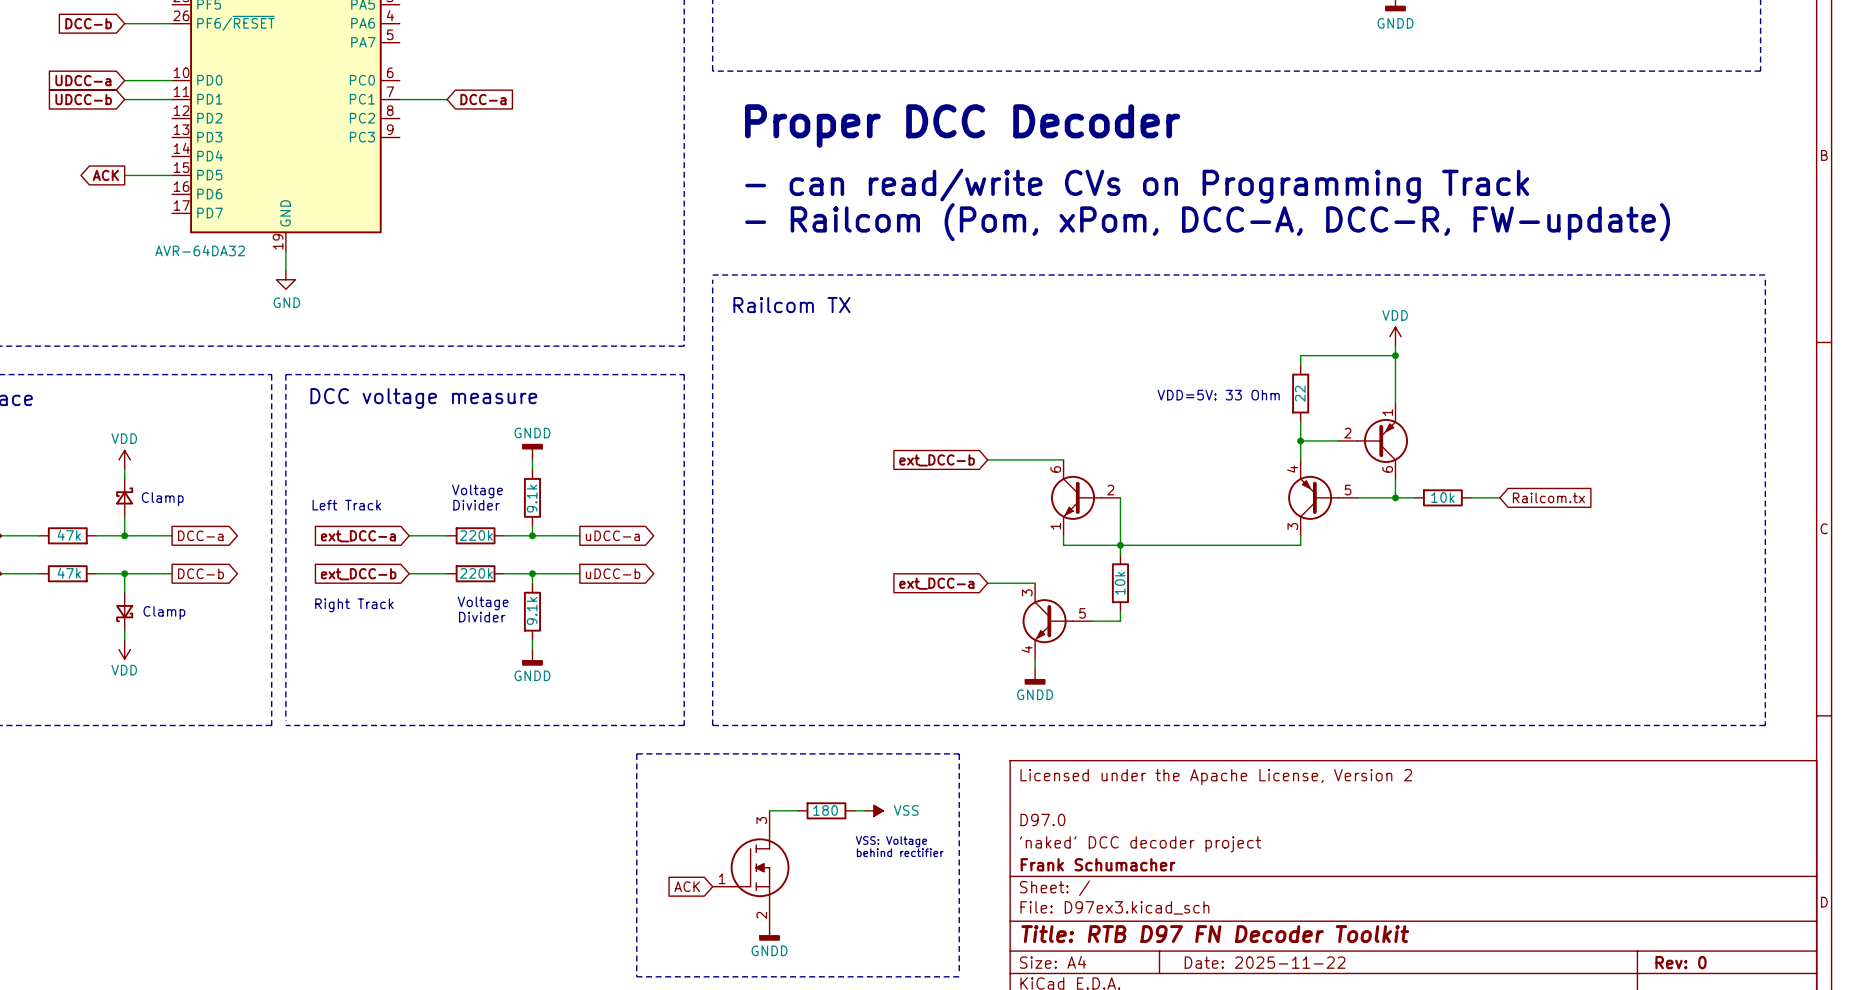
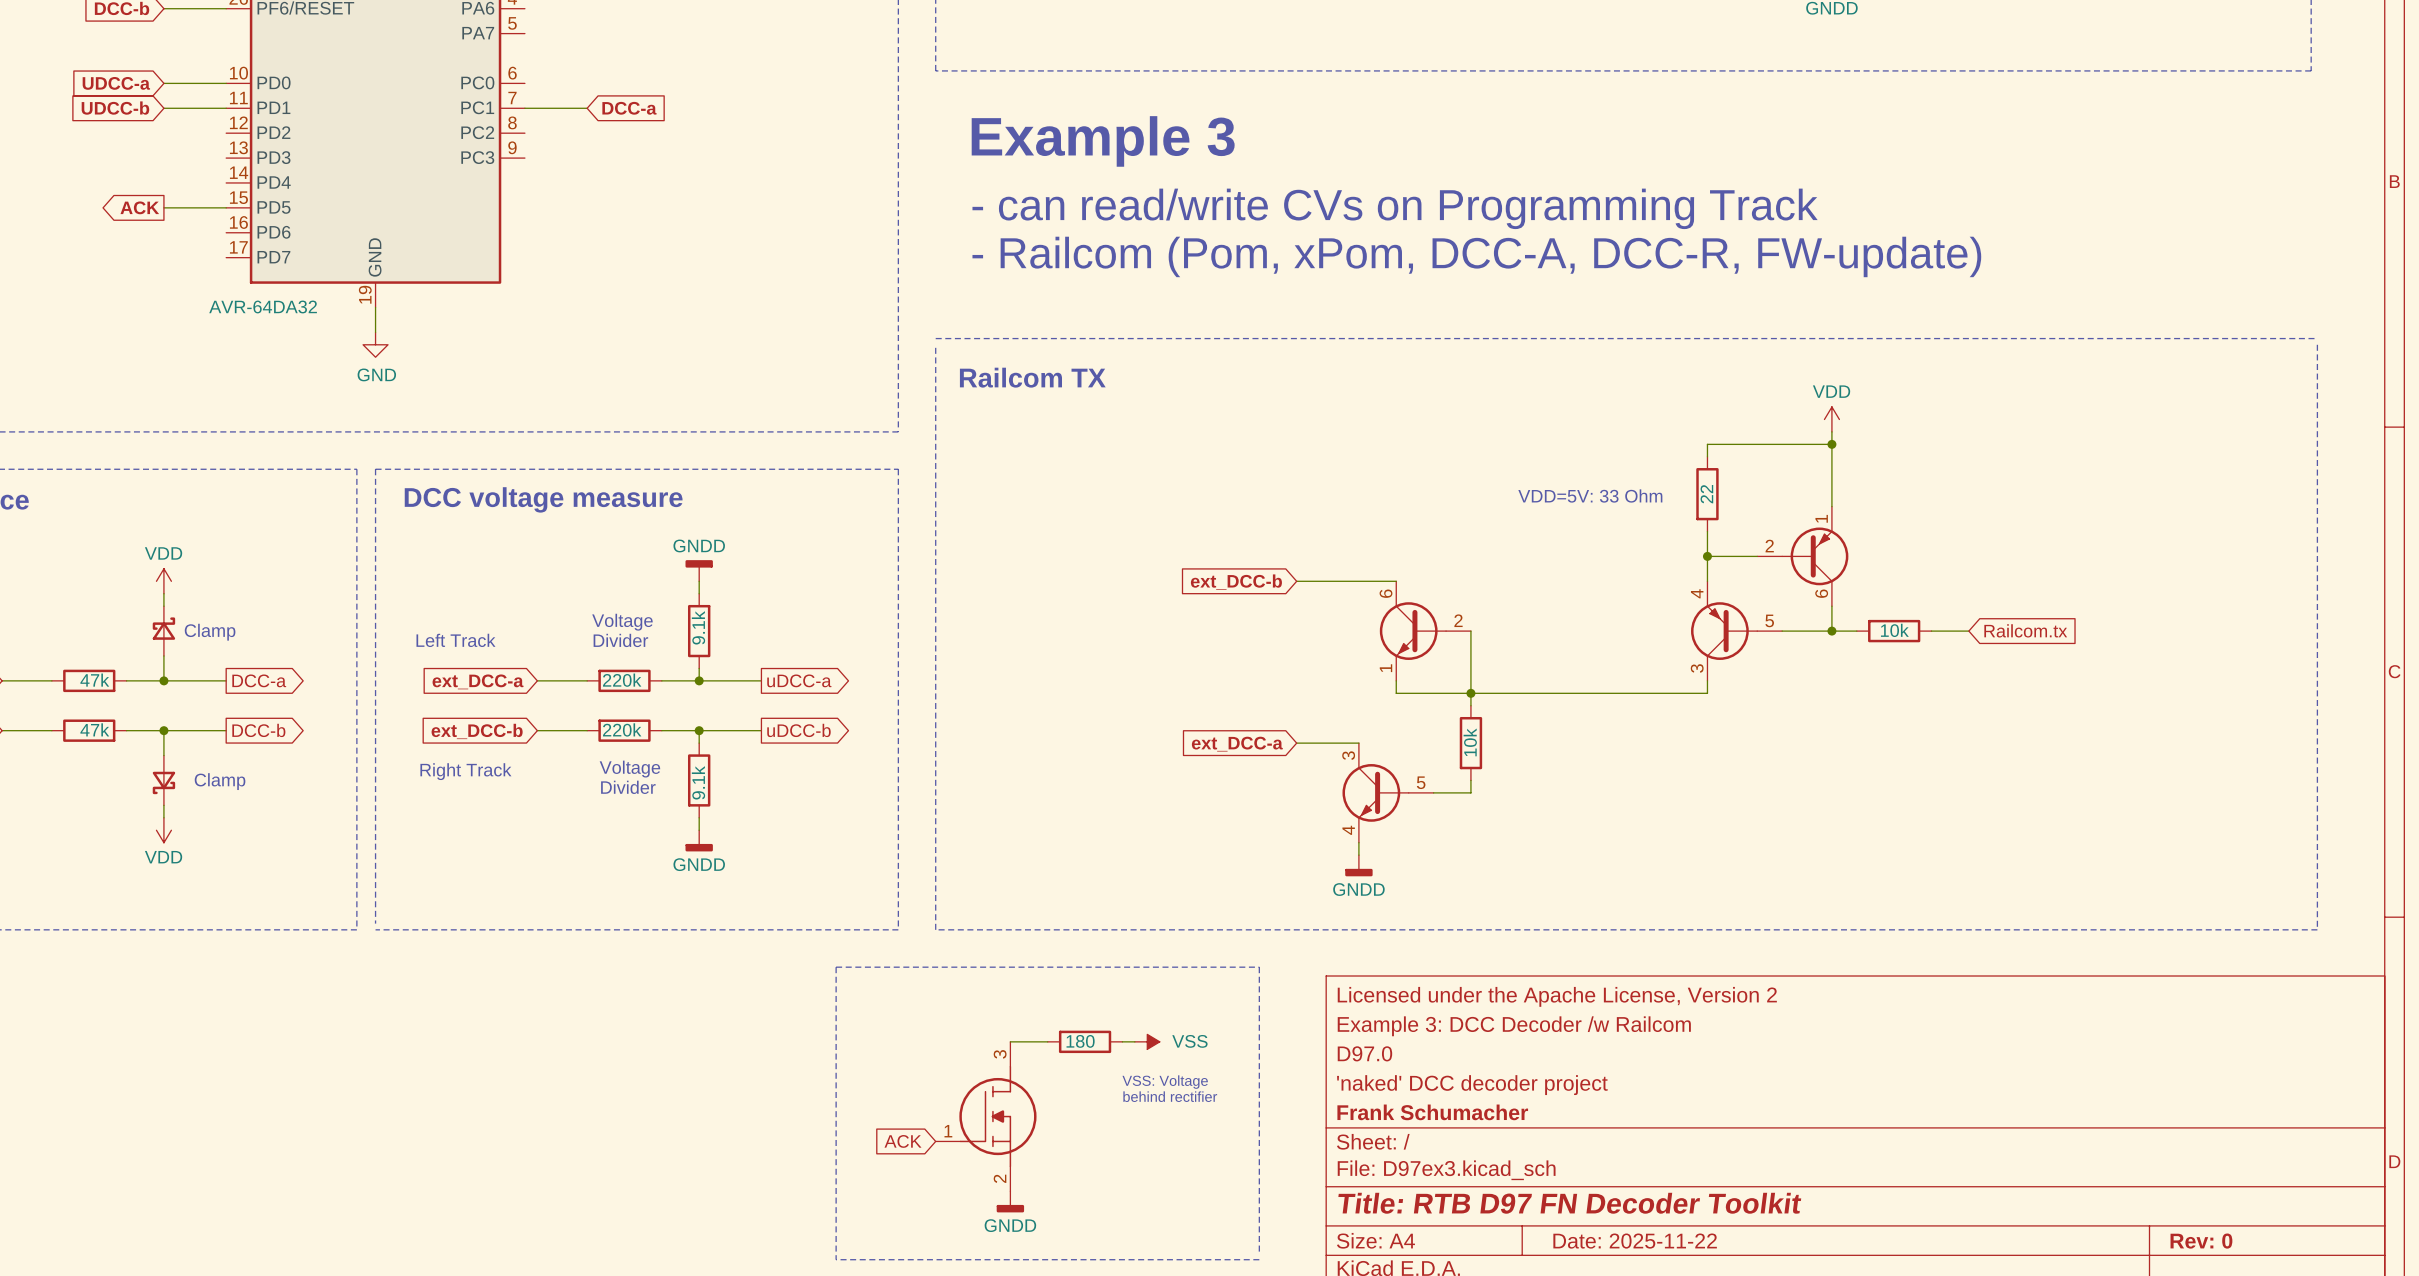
text: Proper DCC Decoder (962, 126) -> Example 3 (1103, 141)
text position: - can read/write CVs on Programming Track (1137, 186) -> - can read/write CVs on Programming Track (1395, 208)
text position: - Railcom (Pom, xPom, DCC-A, DCC-R, FW-update) (1207, 222) -> - Railcom (Pom, xPom, DCC-A, DCC-R, FW-update) (1476, 256)
title block: none -> Example 3: DCC Decoder /w Railcom (1514, 1026)

